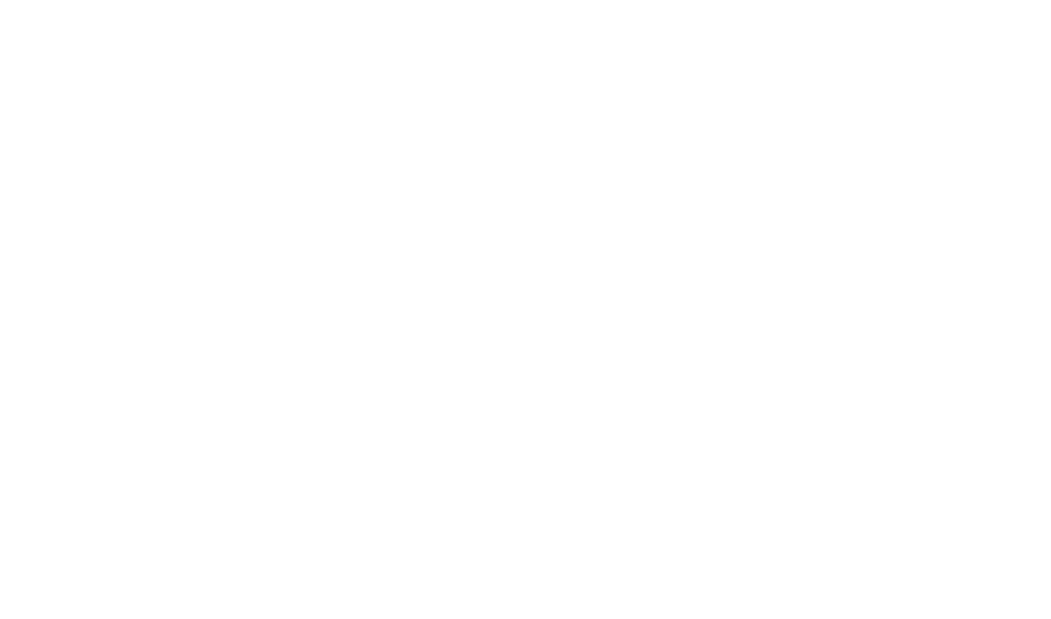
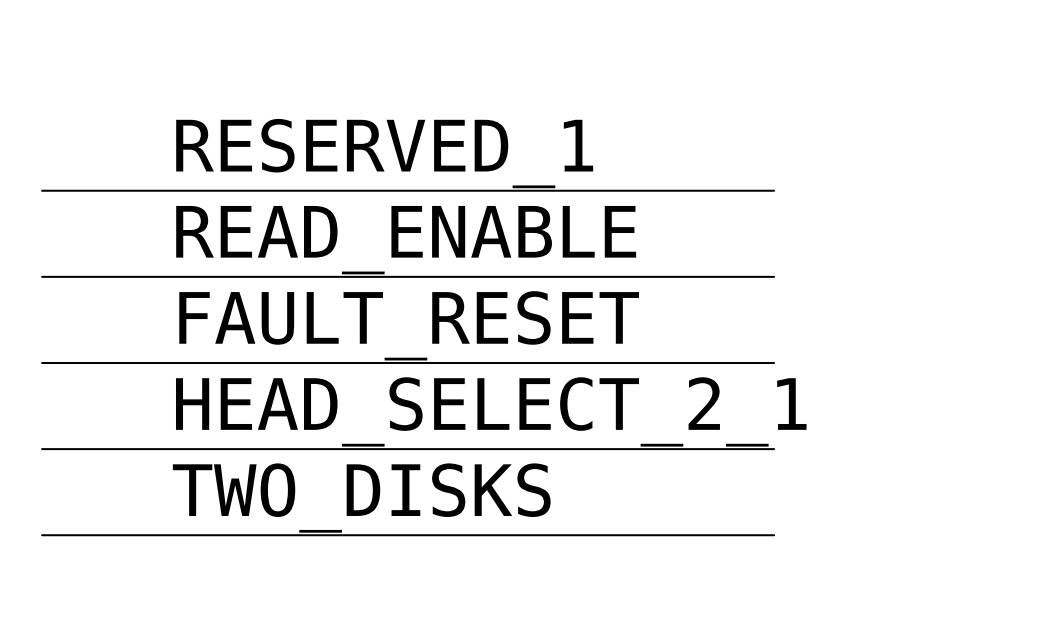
label: none -> RESERVED_1 (384, 153)
wire: none -> (42, 190) (774, 190)
label: none -> READ_ENABLE (406, 240)
wire: none -> (42, 276) (774, 276)
label: none -> FAULT_RESET (409, 325)
wire: none -> (42, 362) (774, 362)
label: none -> HEAD_SELECT_2_1 (491, 411)
wire: none -> (42, 449) (774, 449)
label: none -> TWO_DISKS (361, 498)
wire: none -> (42, 535) (774, 535)

